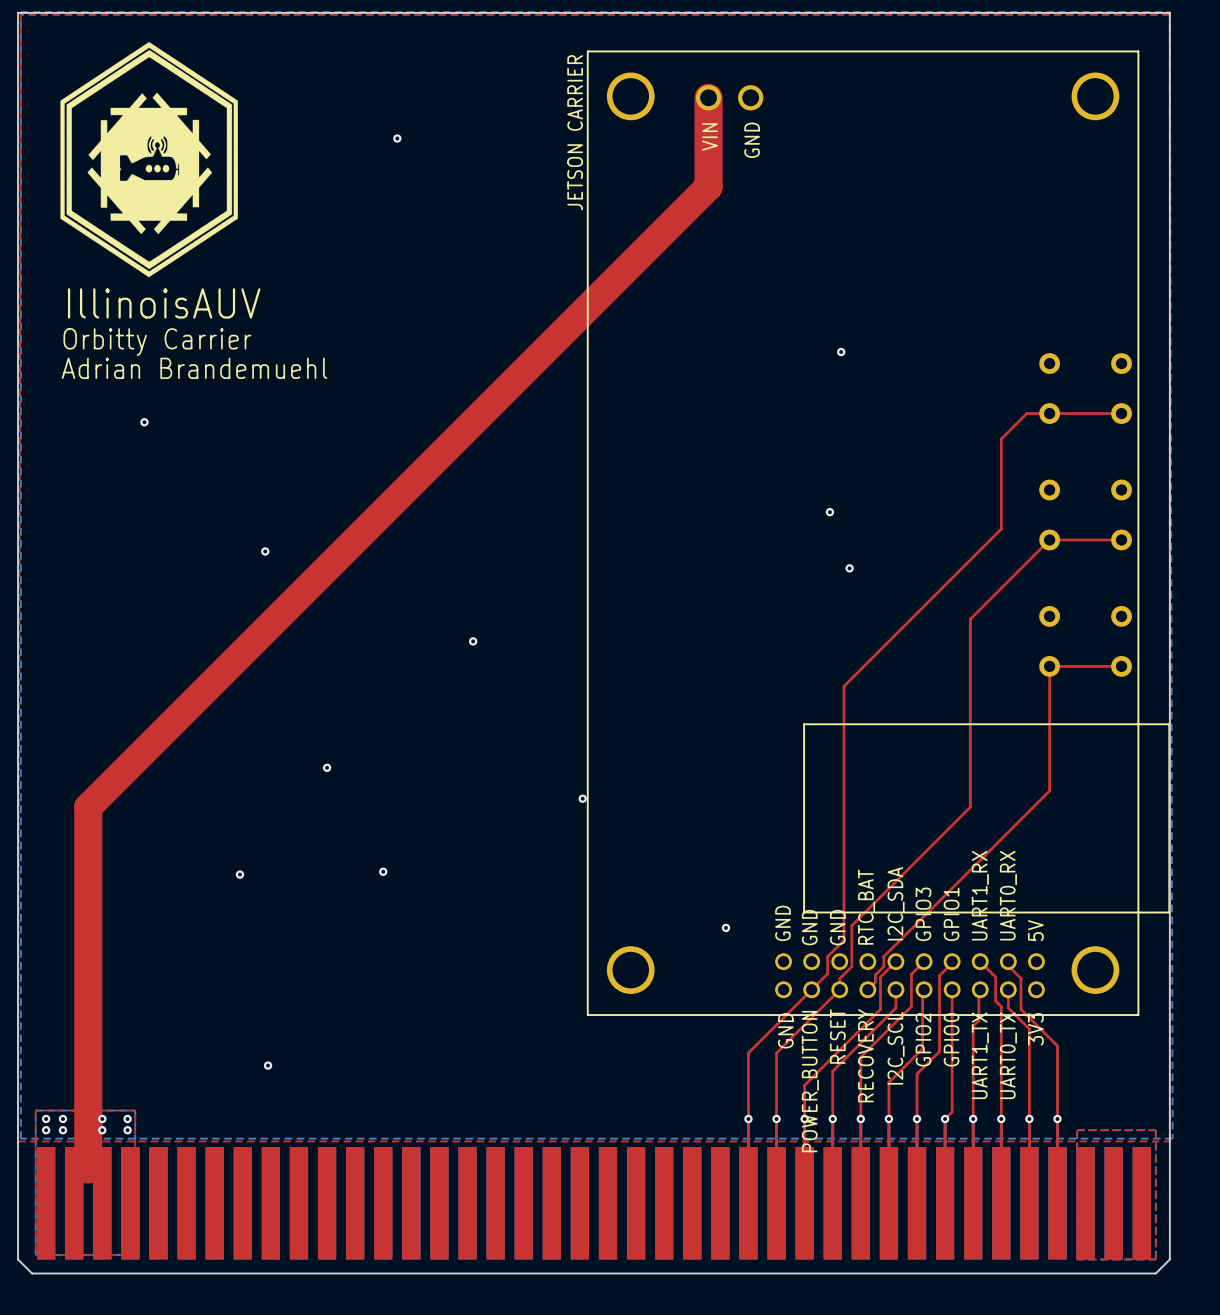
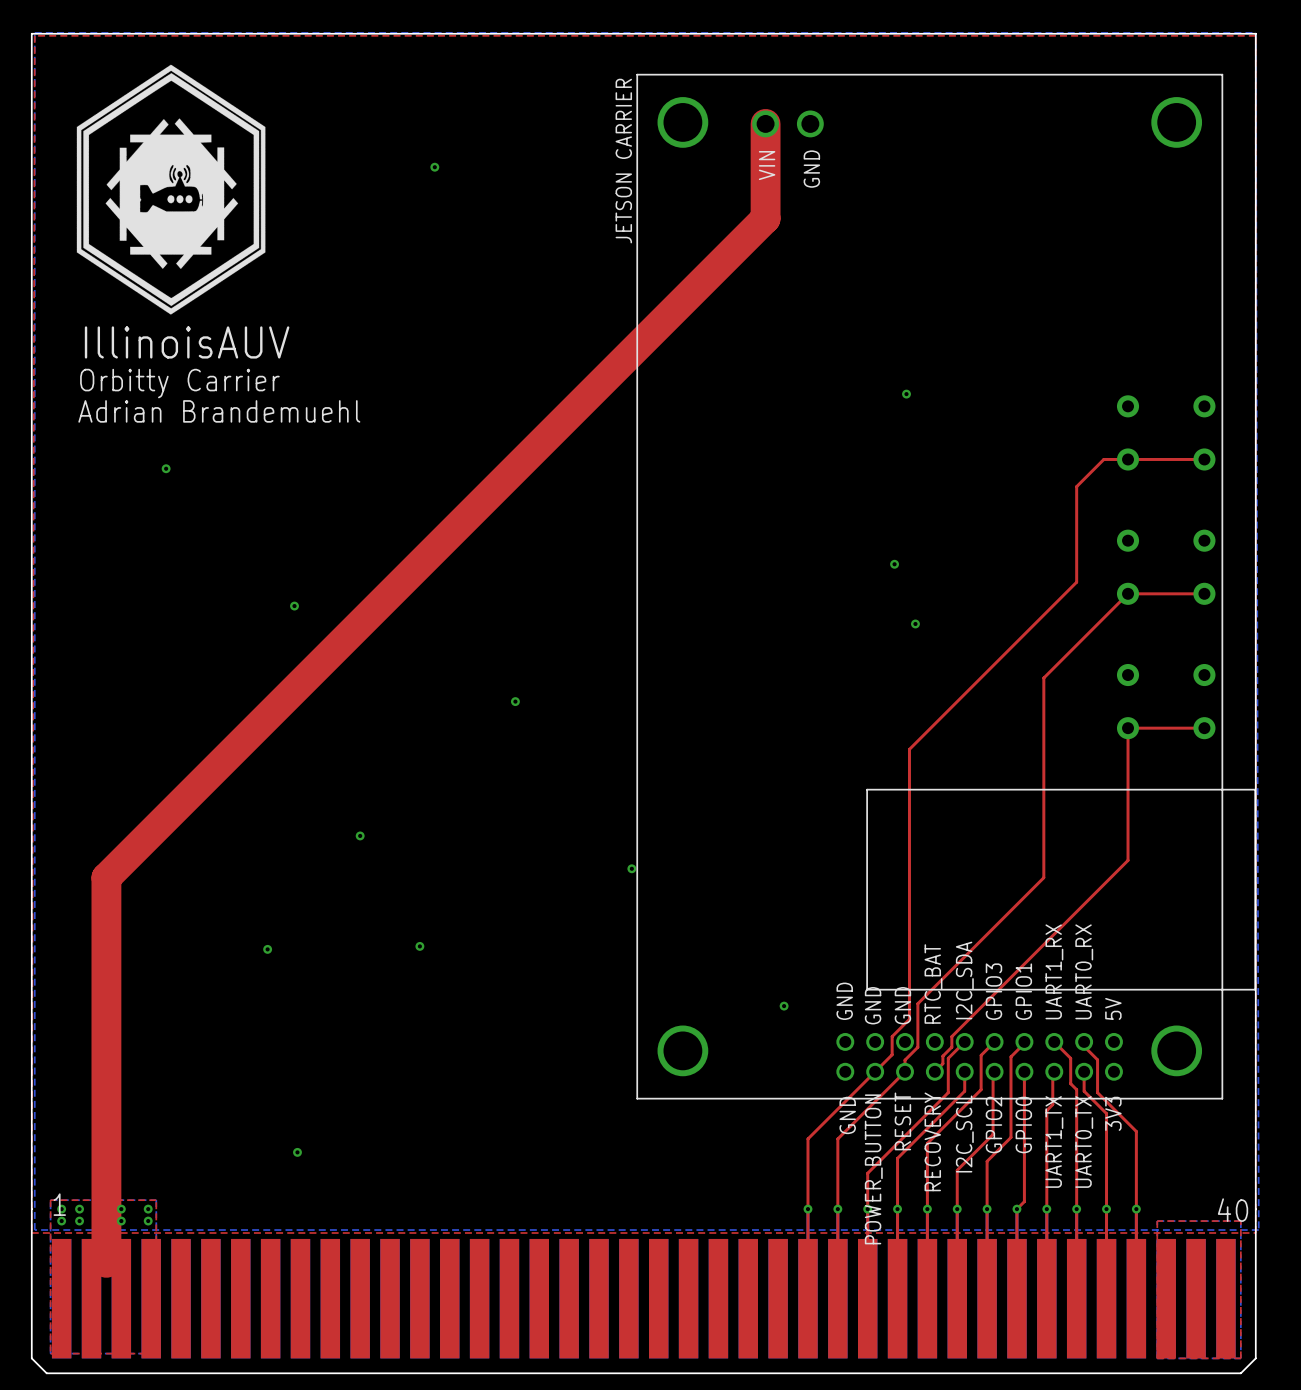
text: none -> 1 (59, 1204)
text: none -> 40 (1233, 1210)

